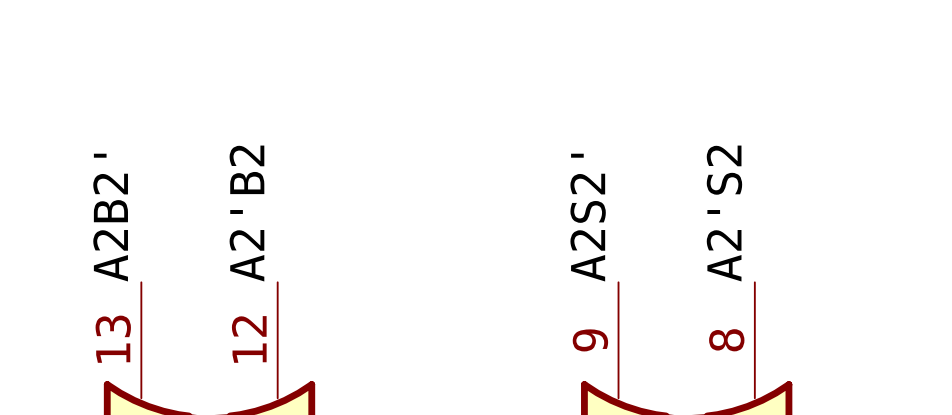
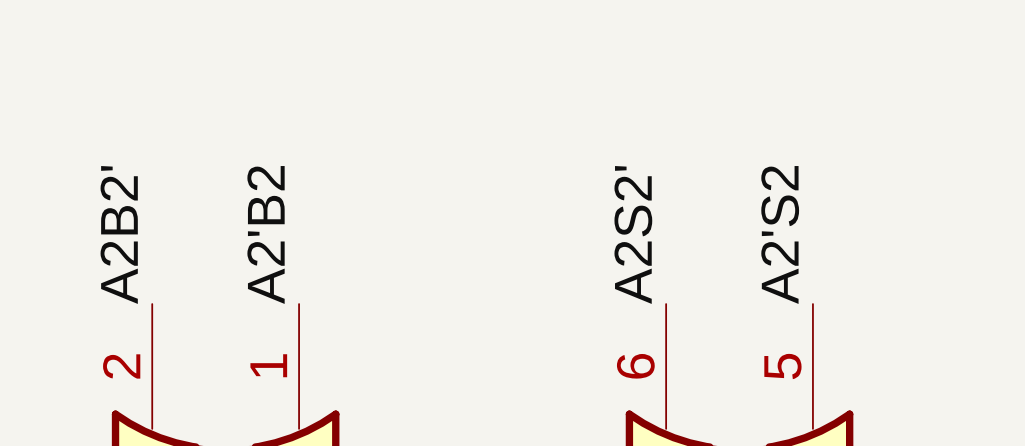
part pin number: 13 (113, 339) -> 2 (121, 366)
part pin number: 12 (249, 339) -> 1 (268, 365)
part pin number: 9 (590, 340) -> 6 (635, 366)
part pin number: 8 (726, 340) -> 5 (782, 366)

